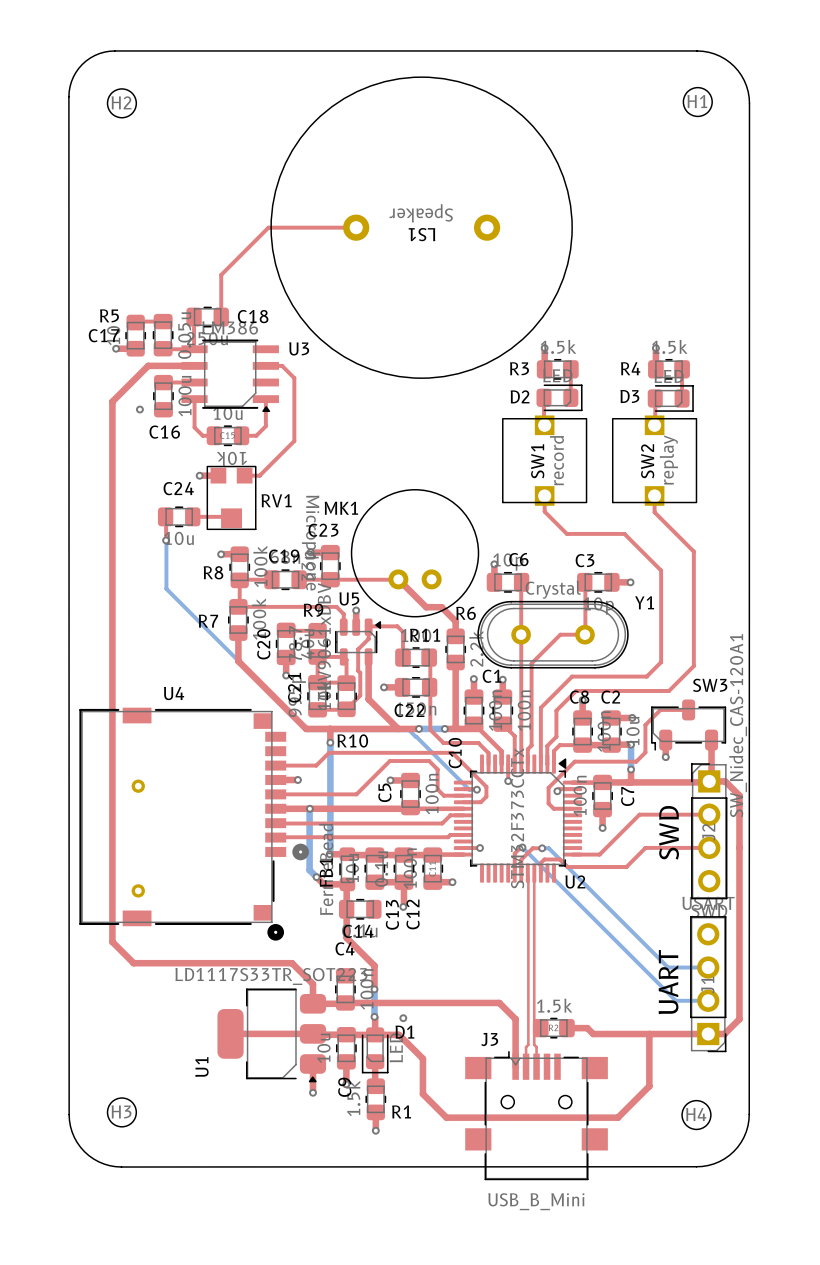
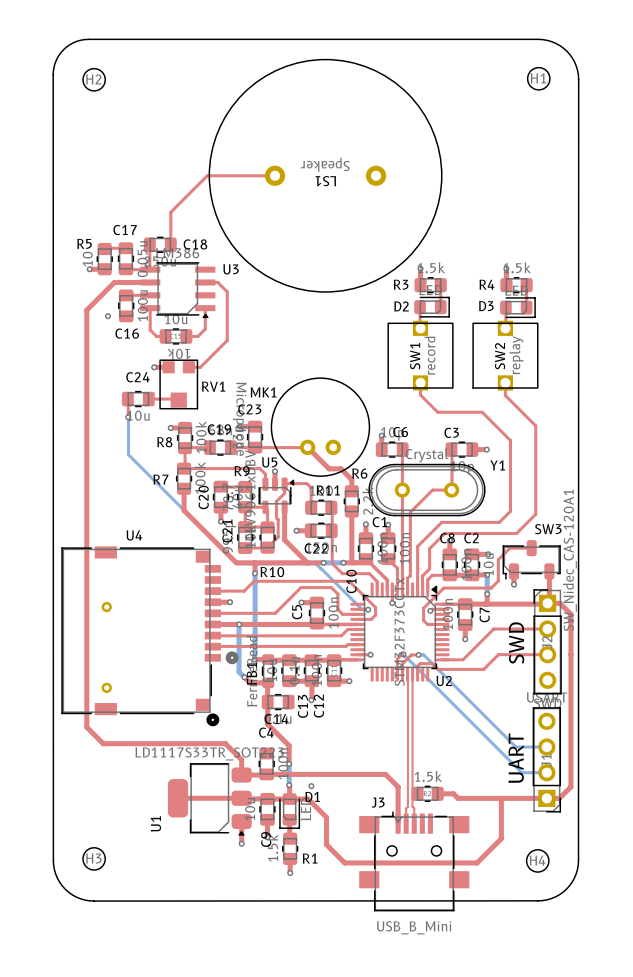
C17 name position: C17 (103, 335) -> C17 (125, 230)

